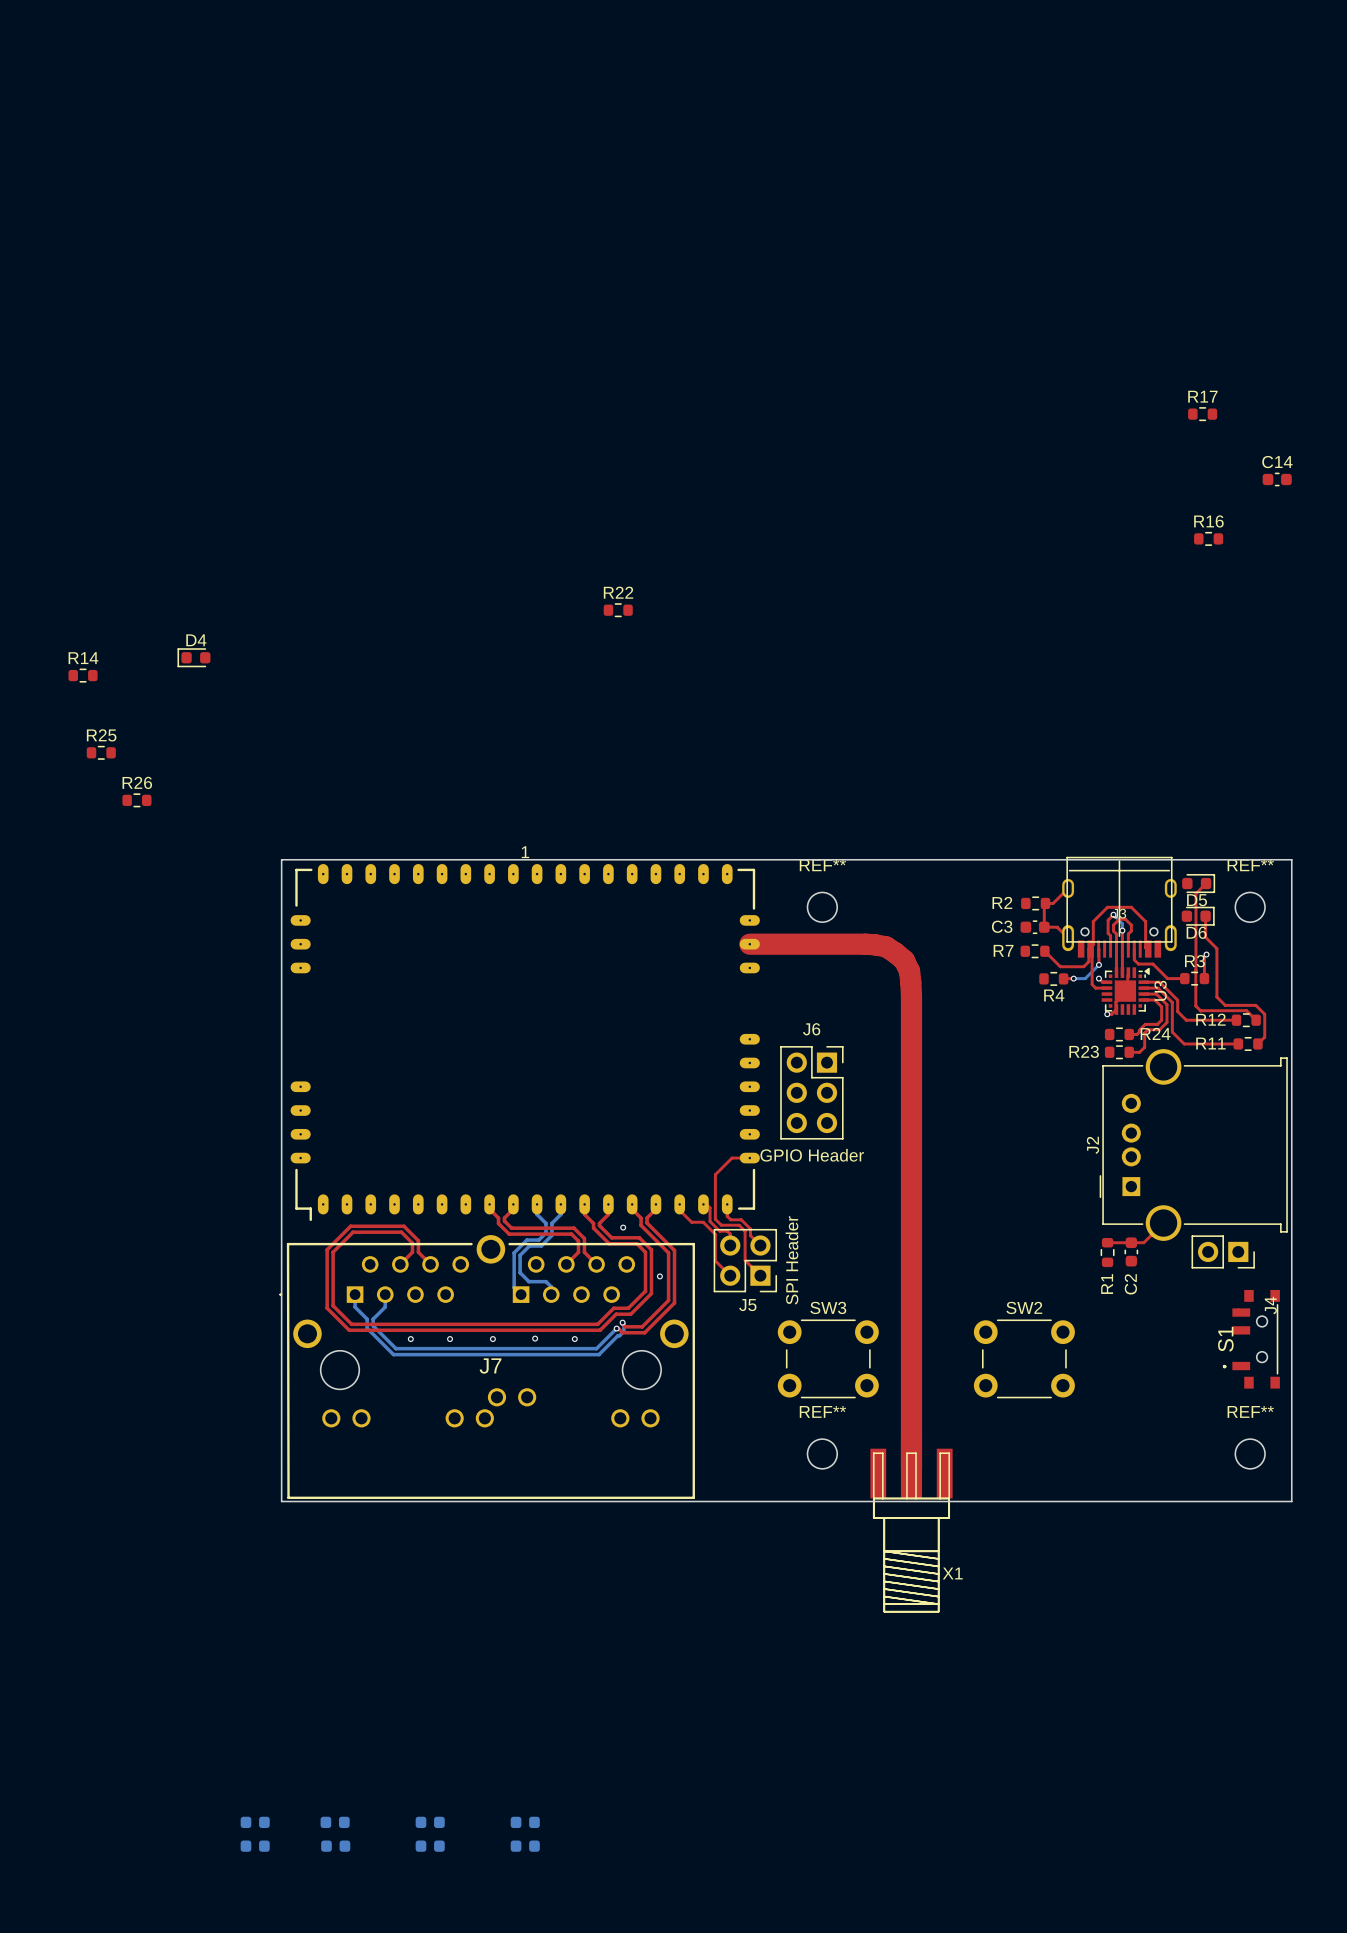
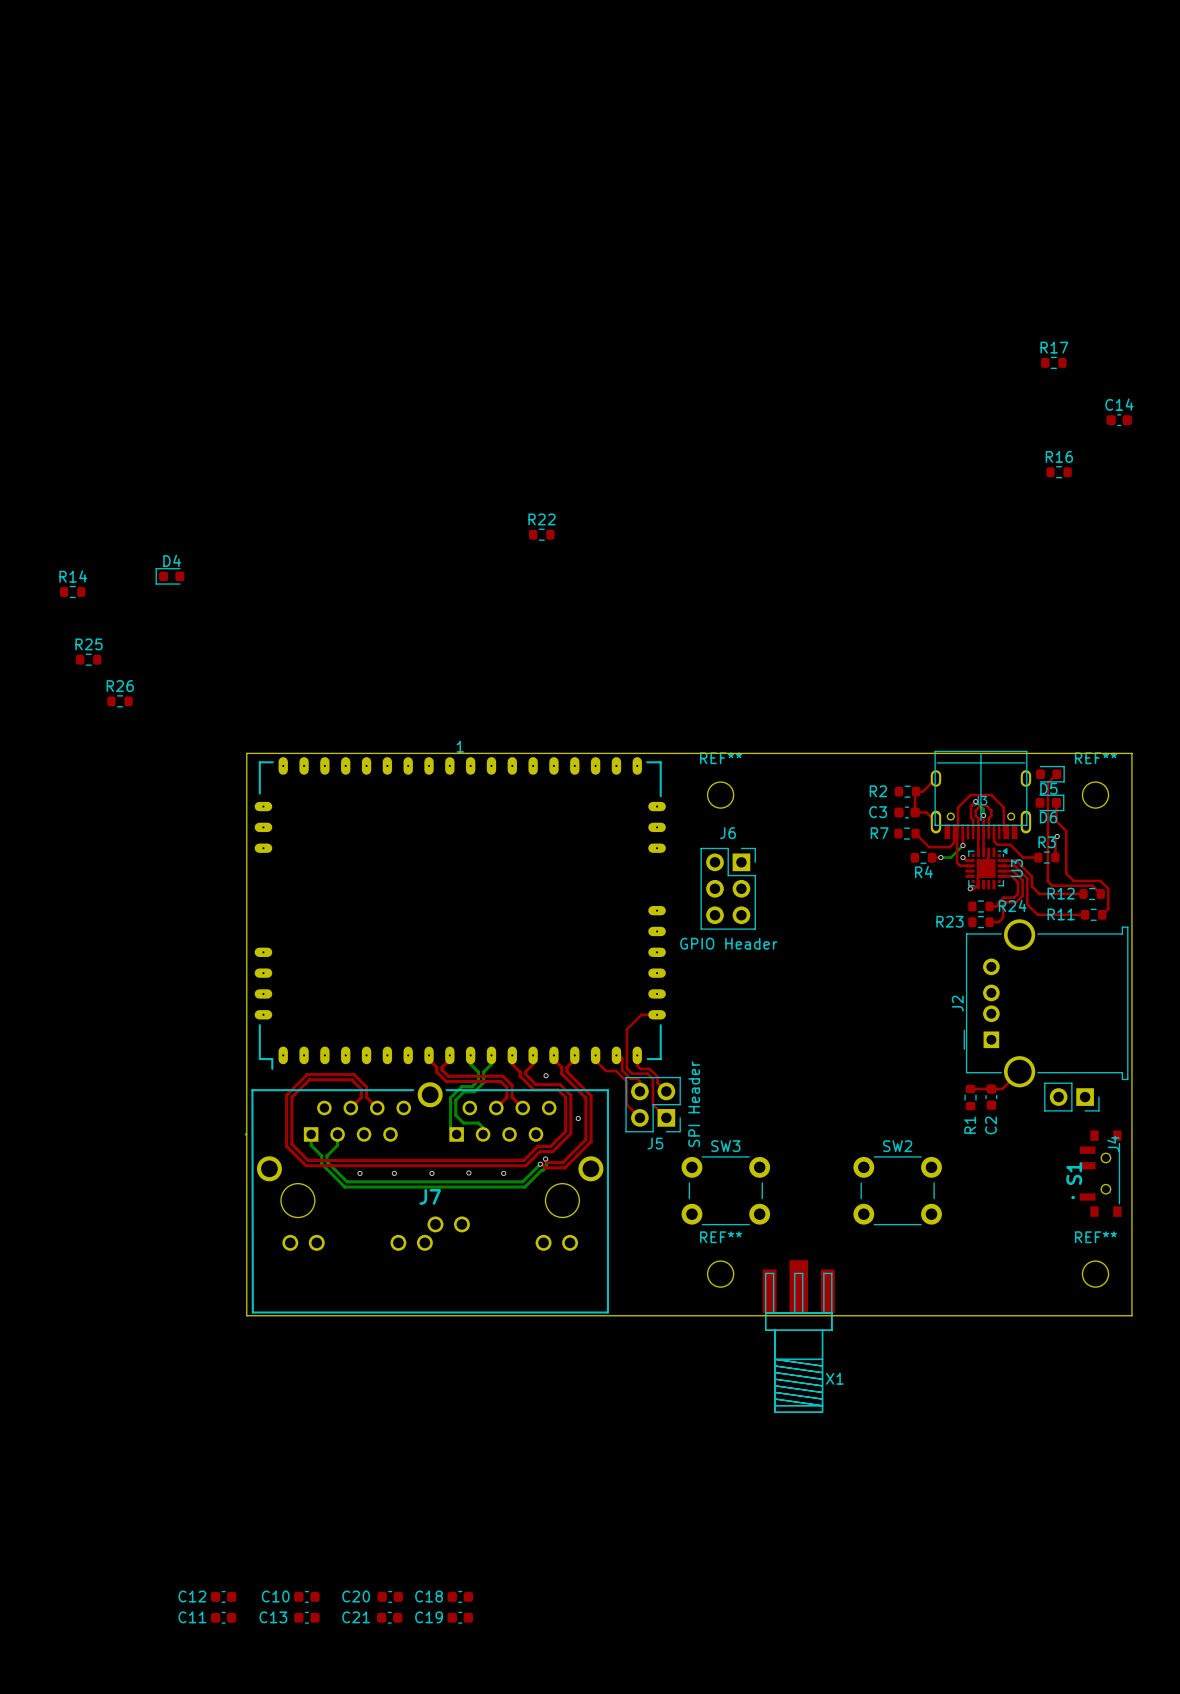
top track: (749, 944) (875, 944) (886, 946) (895, 952) (904, 960) (909, 971) (911, 995) (911, 1468) -> none
J6 position: (811, 1092) -> (728, 888)
C18 side: bottom (255, 1822) -> top (460, 1596)
C20 side: bottom (335, 1822) -> top (390, 1596)
C10 side: bottom (430, 1822) -> top (306, 1596)
C12 side: bottom (525, 1822) -> top (223, 1596)
C19 side: bottom (255, 1846) -> top (460, 1617)
C21 side: bottom (335, 1846) -> top (389, 1617)
C13 side: bottom (430, 1846) -> top (306, 1617)
C11 side: bottom (525, 1846) -> top (223, 1617)

